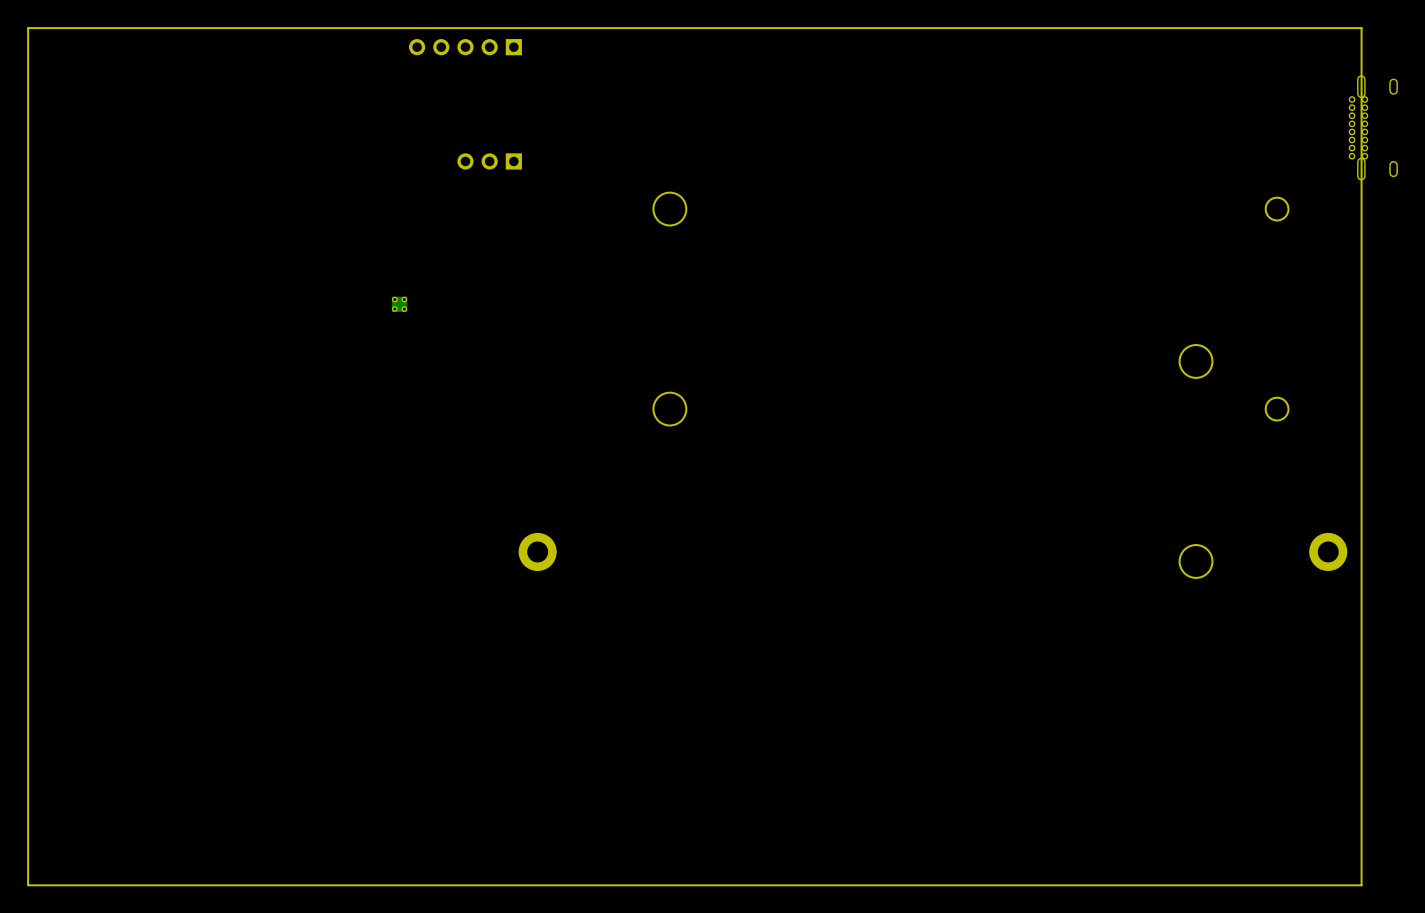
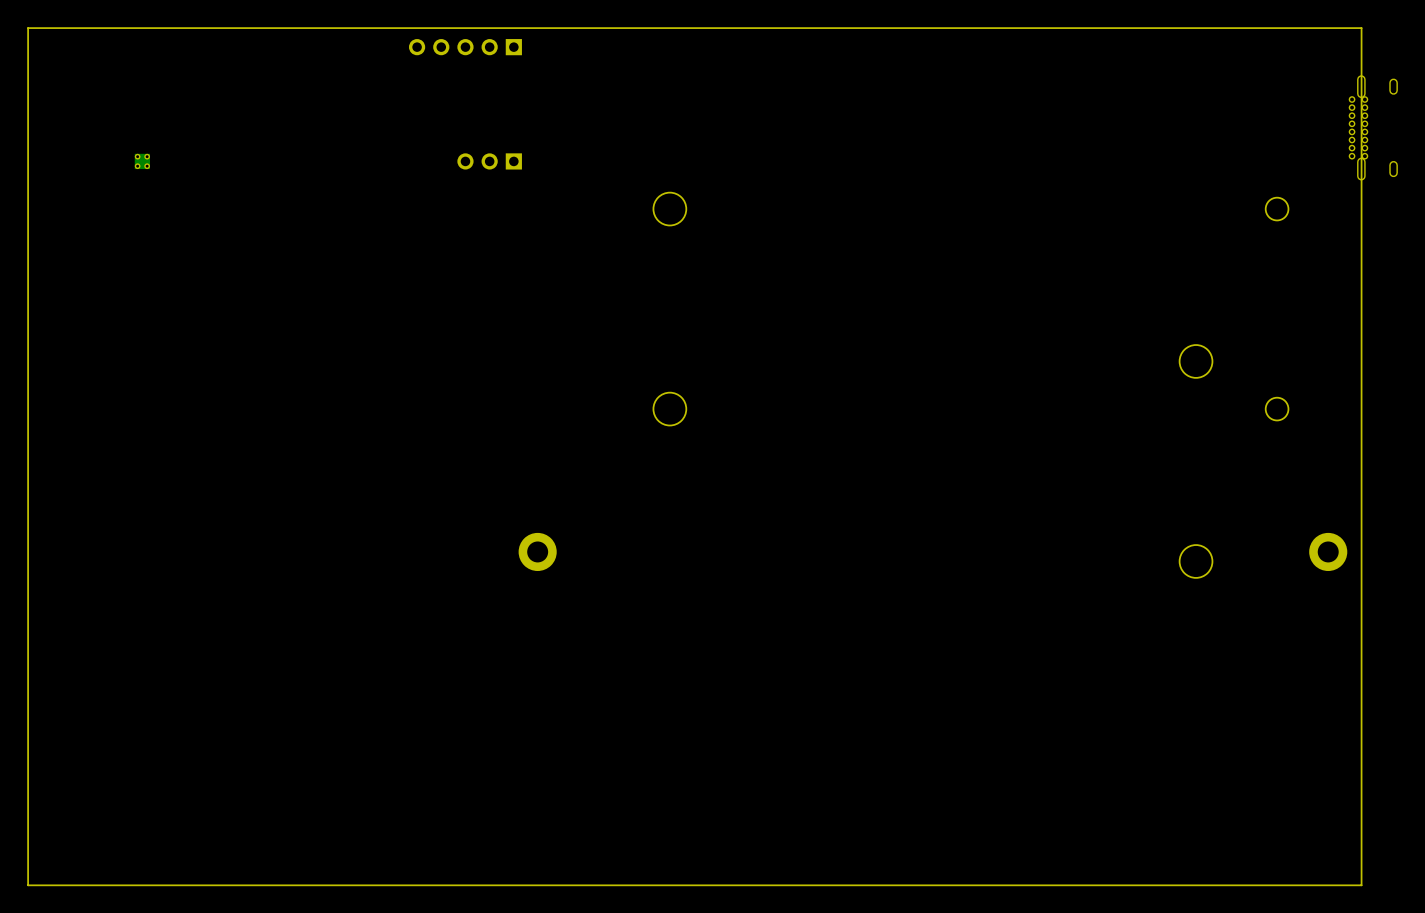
part: none -> (142, 161)
part: (399, 304) -> none

